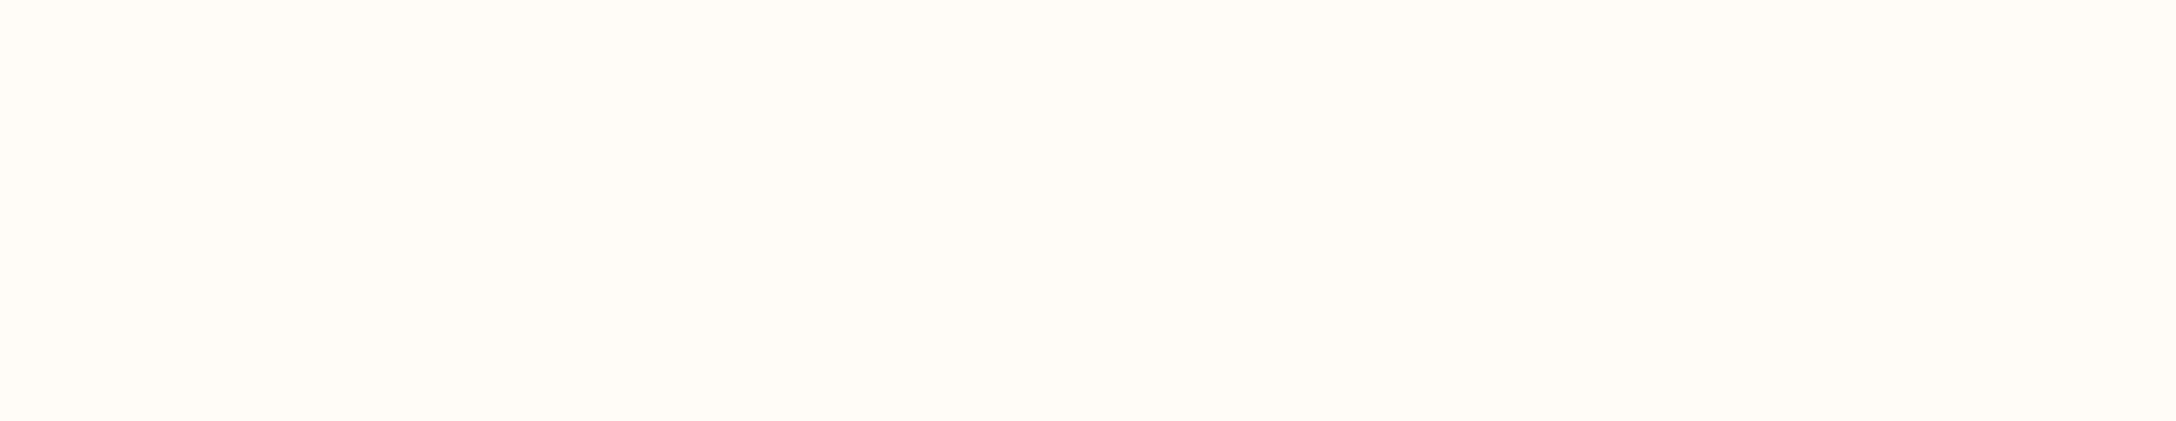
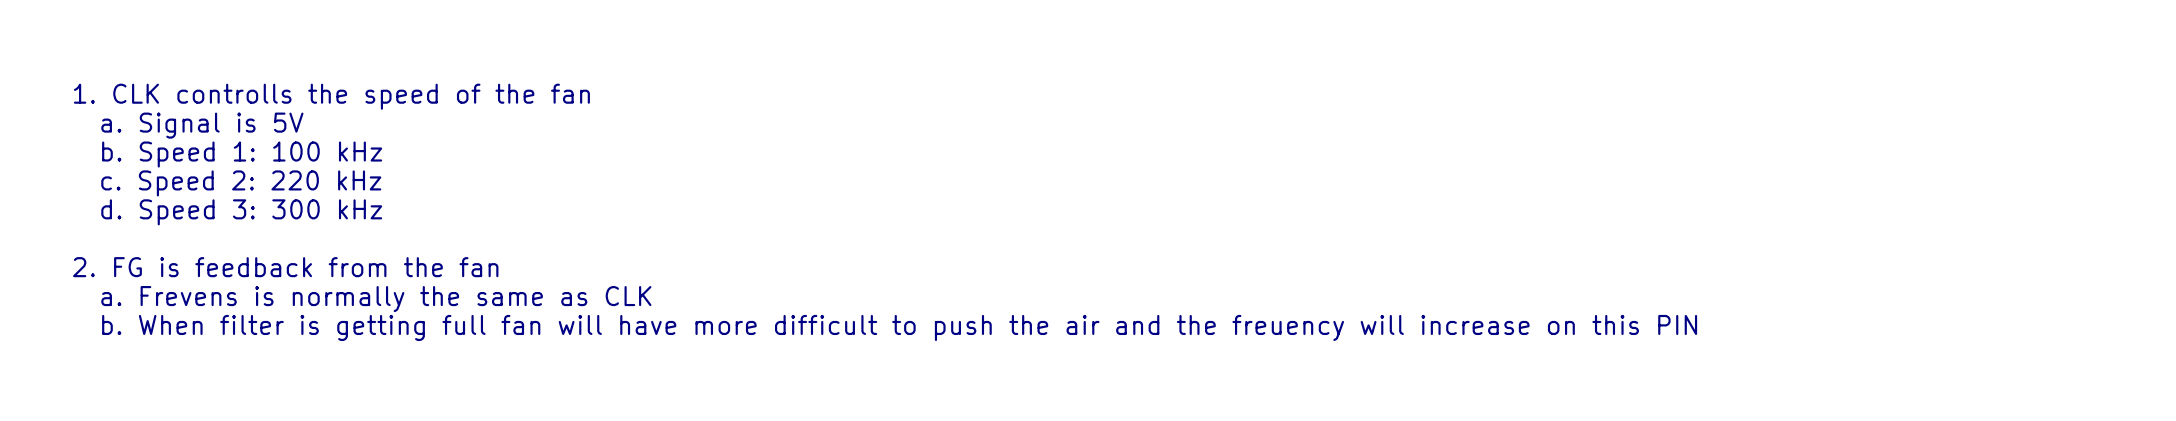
text: none -> 1. CLK controlls the speed of the fan (331, 96)
text: none -> a. Signal is 5V (202, 125)
text: none -> b. Speed 1: 100 kHz (242, 154)
text: none -> c. Speed 2: 220 kHz (241, 183)
text: none -> d. Speed 3: 300 kHz (241, 212)
text: none -> 2. FG is feedback from the fan (285, 267)
text: none -> a. Frevens is normally the same as CLK (376, 299)
text: none -> b. When filter is getting full fan will have more difficult to push the air and the freuency will increase on this PIN (899, 327)

